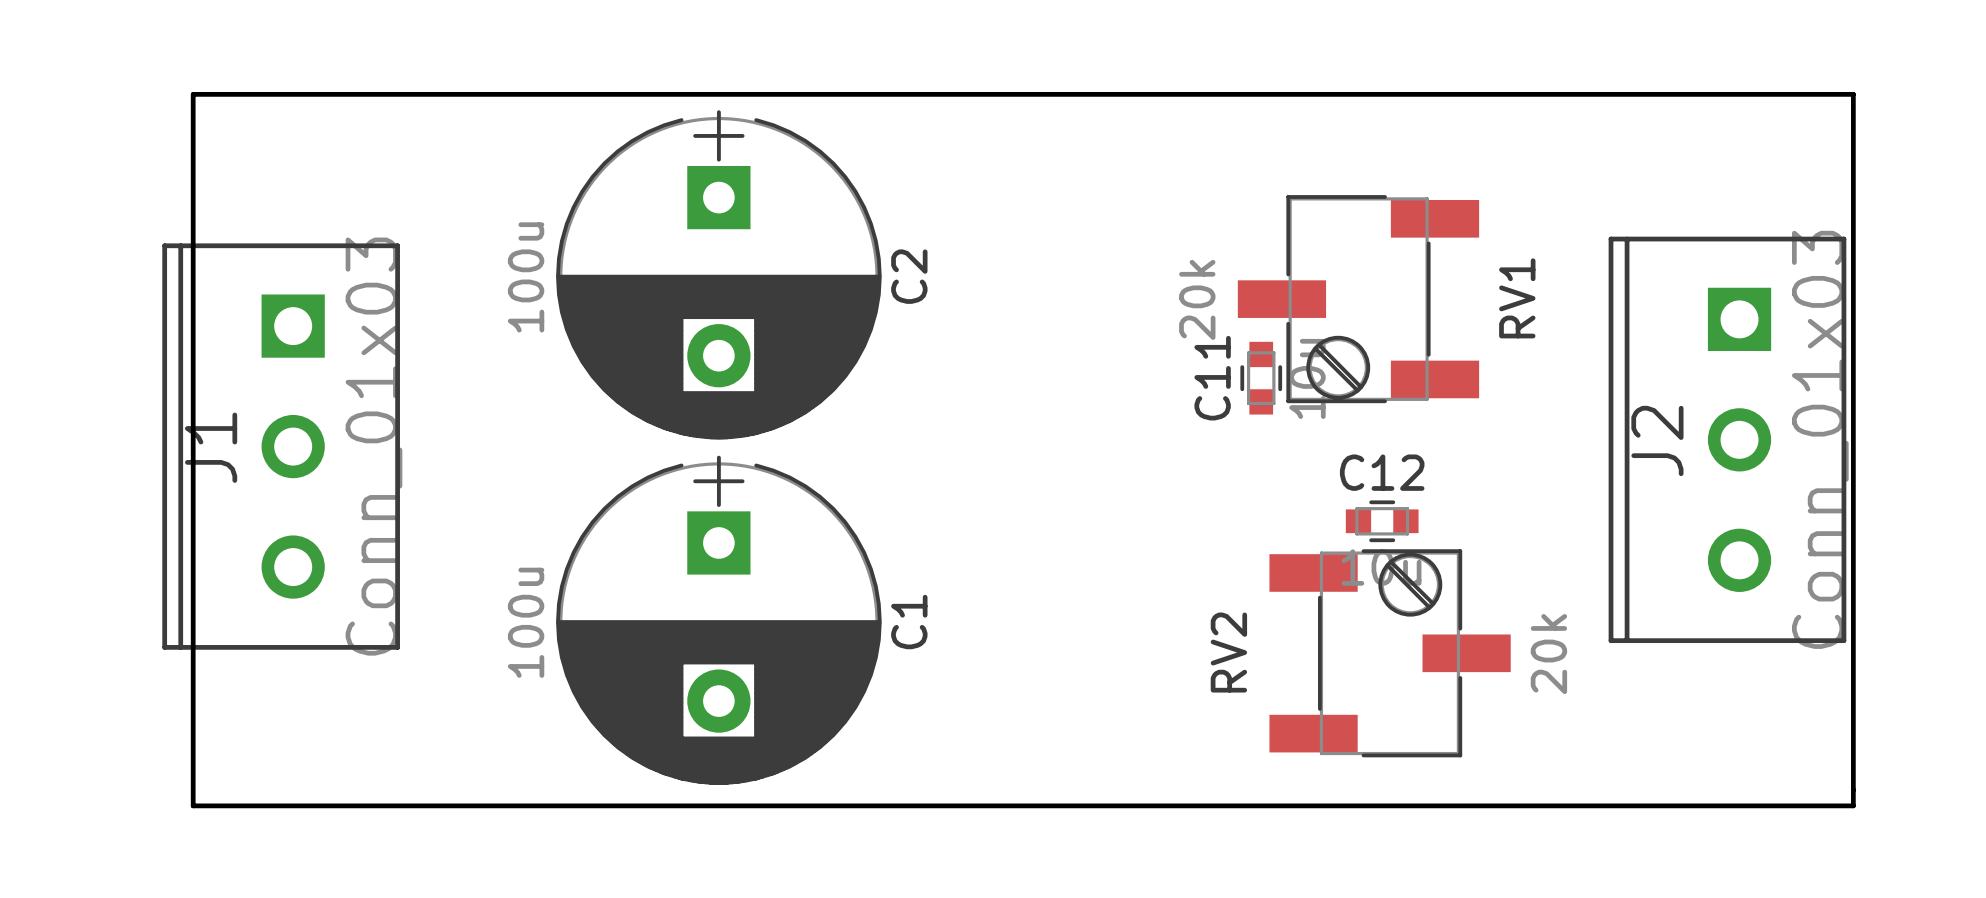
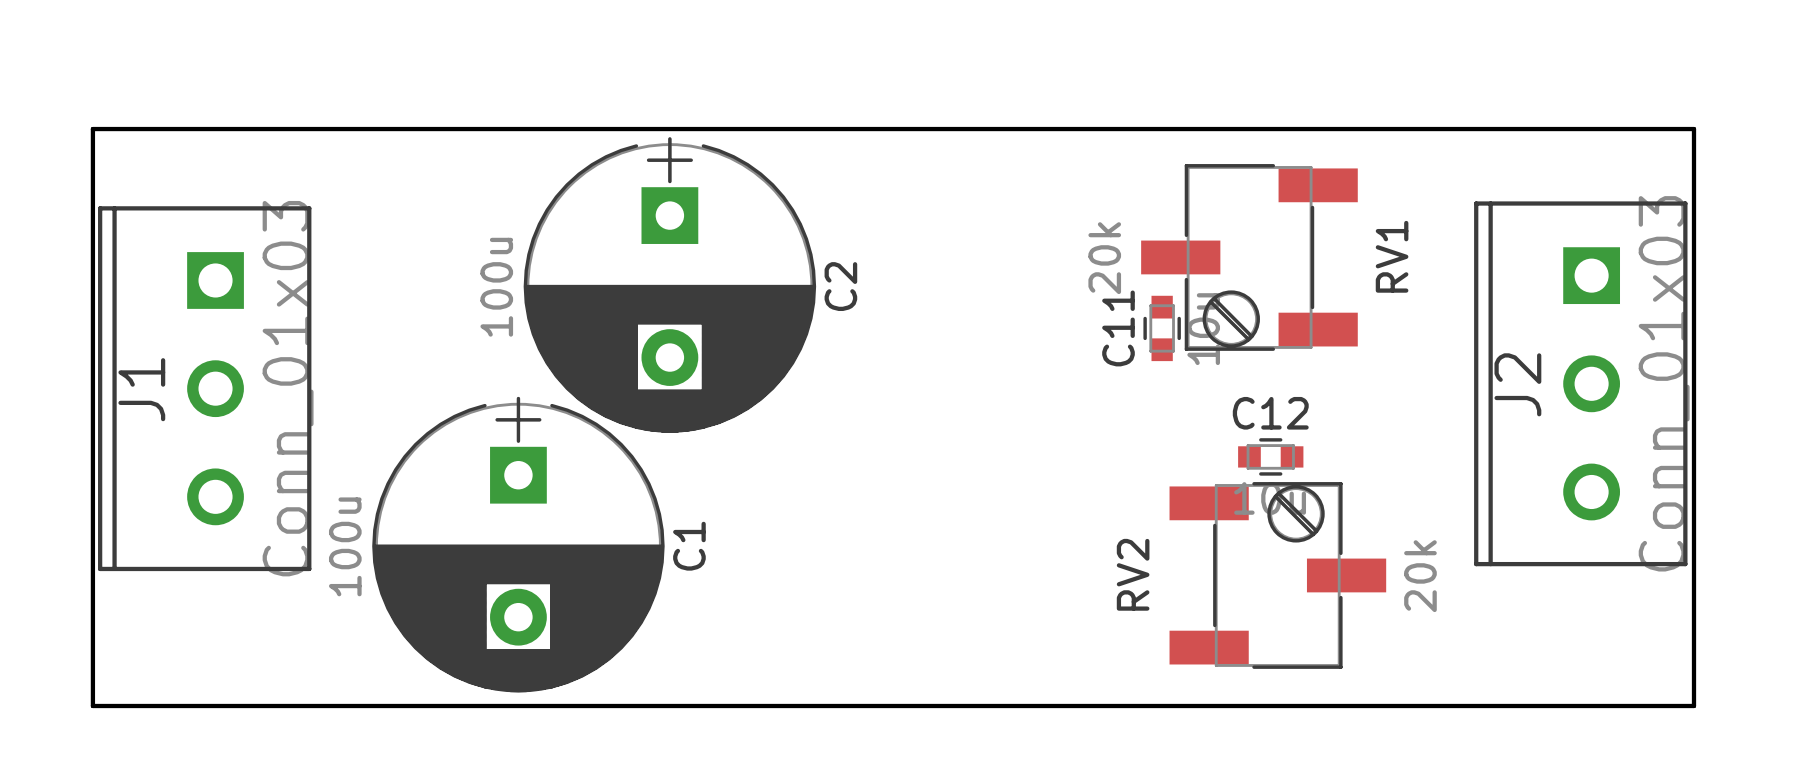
board edge: (193, 94) (193, 805) (1853, 805) (1853, 94) (193, 94) -> (92, 129) (92, 705) (1693, 705) (1693, 129) (92, 129)
C2 position: (718, 274) -> (669, 285)
J1 position: (281, 446) -> (204, 388)
C1 position: (718, 620) -> (518, 544)

